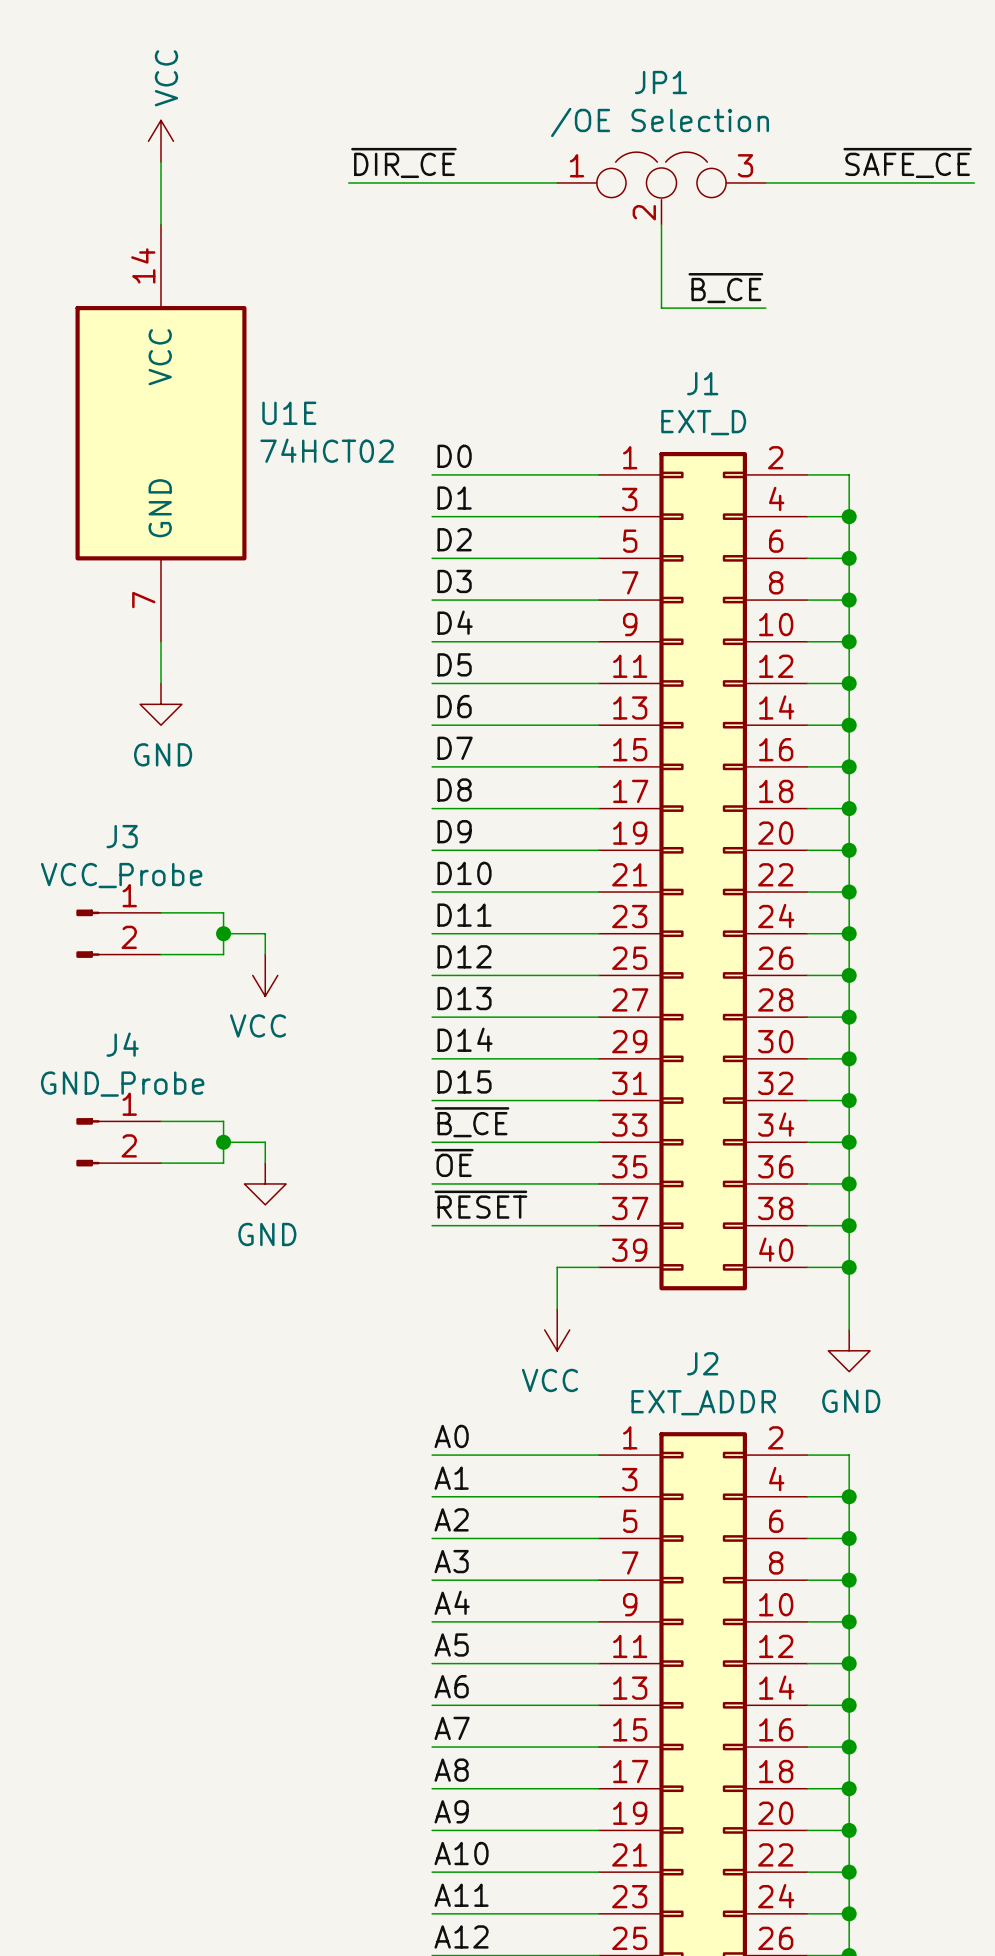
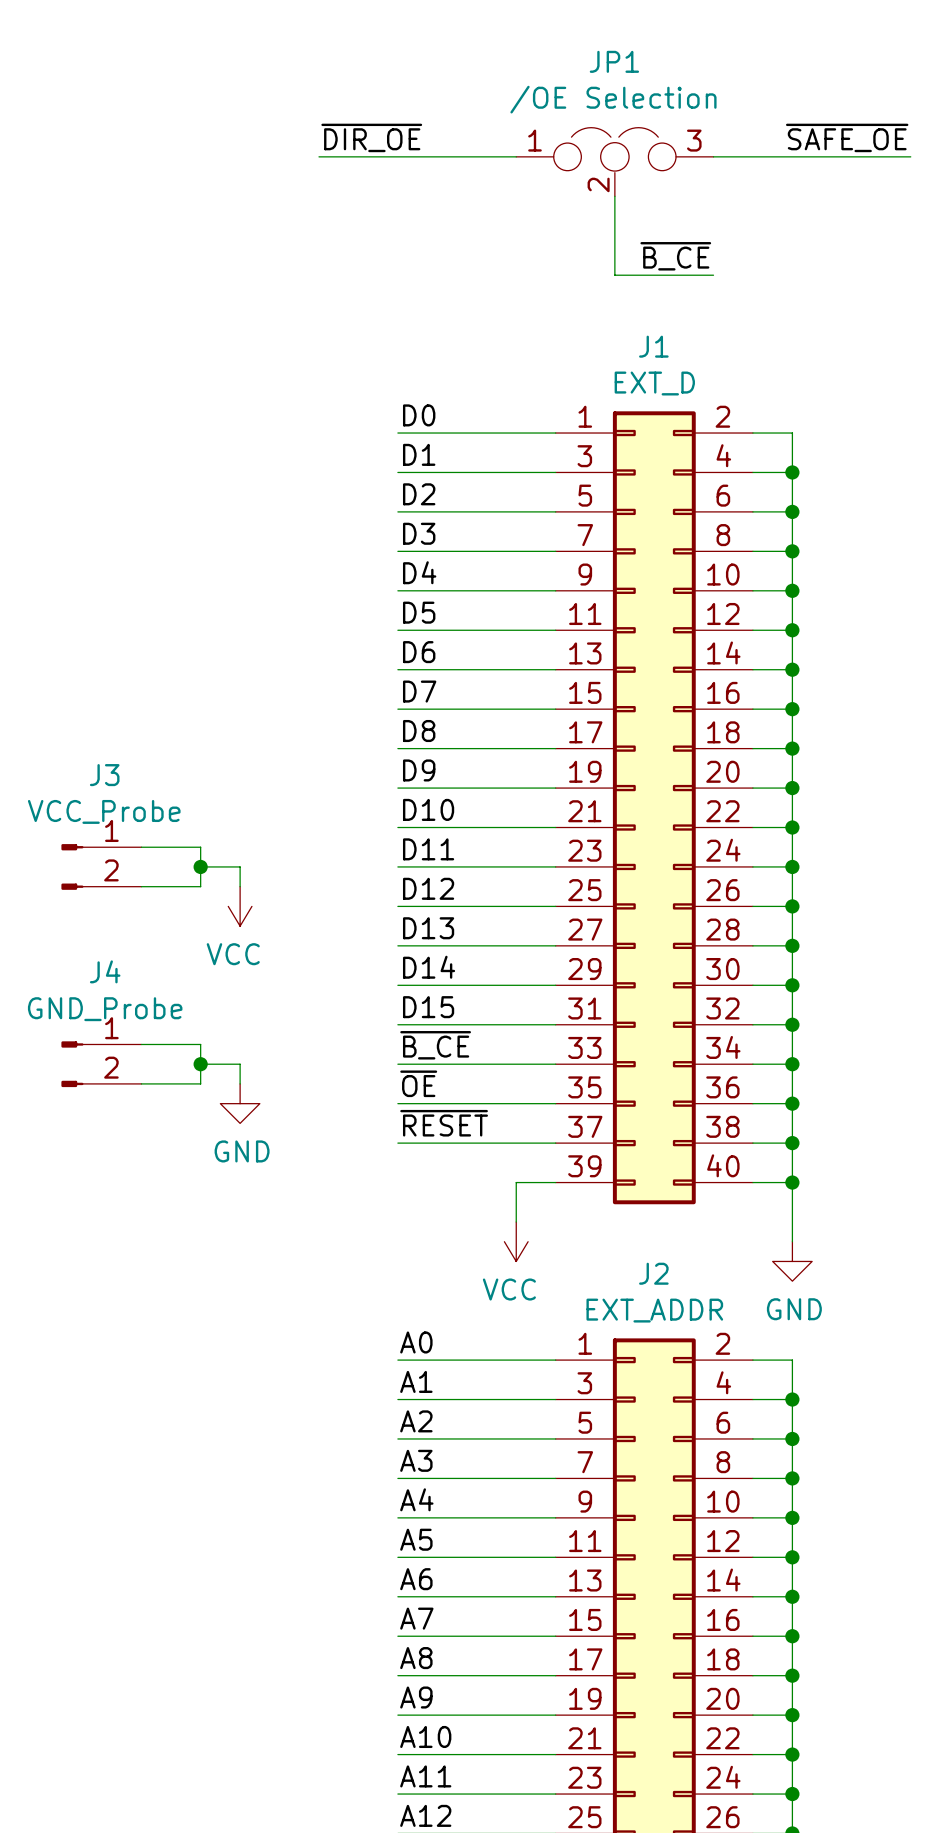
power symbol: VCC (161, 141) -> none
wire: (161, 162) (161, 224) -> none
label: ~{DIR_CE} (403, 162) -> ~{DIR_OE} (371, 137)
label: ~{SAFE_CE} (907, 162) -> ~{SAFE_OE} (847, 137)
U1E: 74HCT02 (161, 433) -> none
wire: (161, 641) (161, 683) -> none
power symbol: GND (161, 704) -> none

